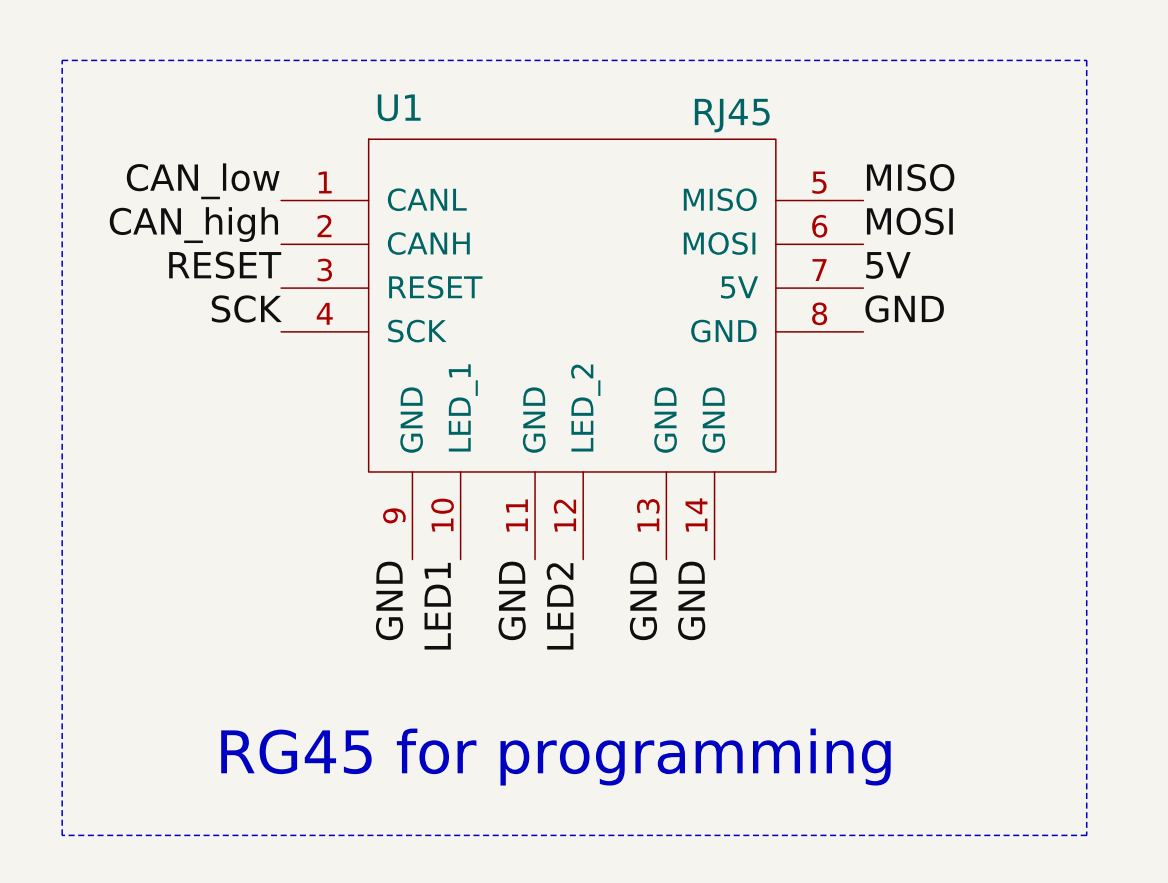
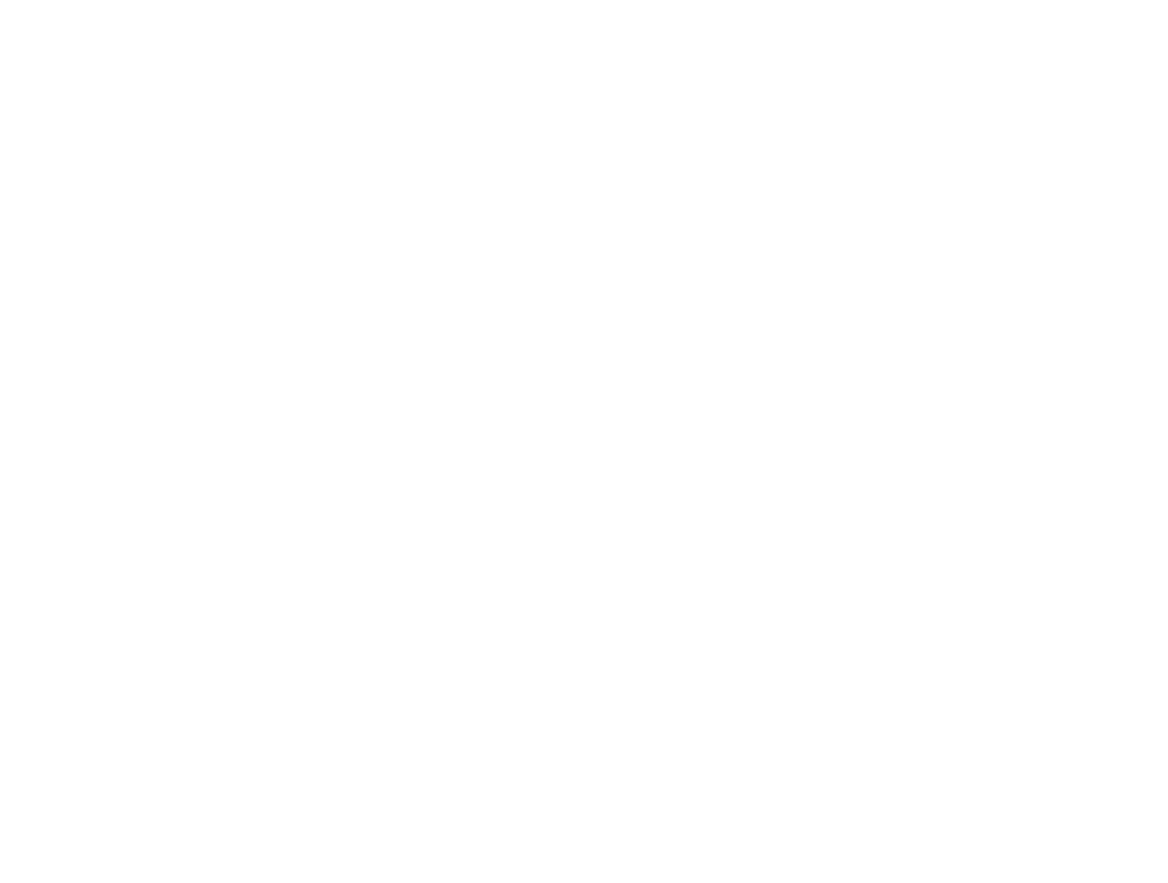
line: (62, 60) (1086, 60) (1086, 835) (62, 835) (62, 60) -> none
label: MISO (910, 177) -> none
label: CAN_low (203, 181) -> none
label: MOSI (909, 221) -> none
label: CAN_high (193, 225) -> none
label: RESET (225, 265) -> none
label: 5V (888, 265) -> none
label: SCK (246, 308) -> none
label: GND (904, 308) -> none
U1: RJ45 (572, 349) -> none
label: GND (389, 600) -> none
label: GND (512, 600) -> none
label: GND (643, 600) -> none
label: GND (691, 600) -> none
label: LED1 (437, 606) -> none
label: LED2 (560, 606) -> none
text: RG45 for programming (555, 757) -> none

